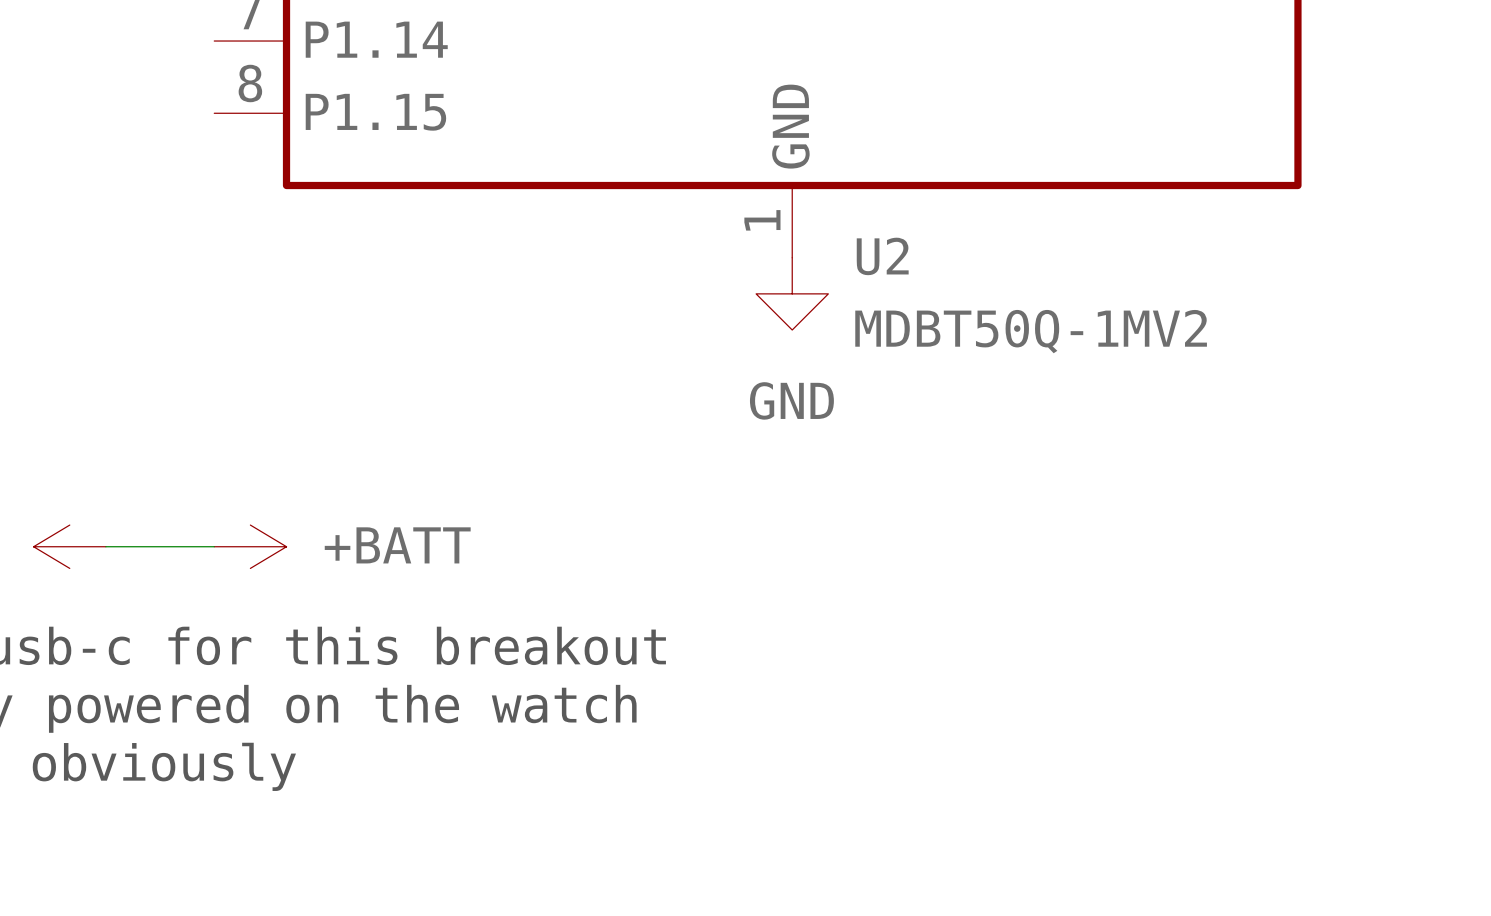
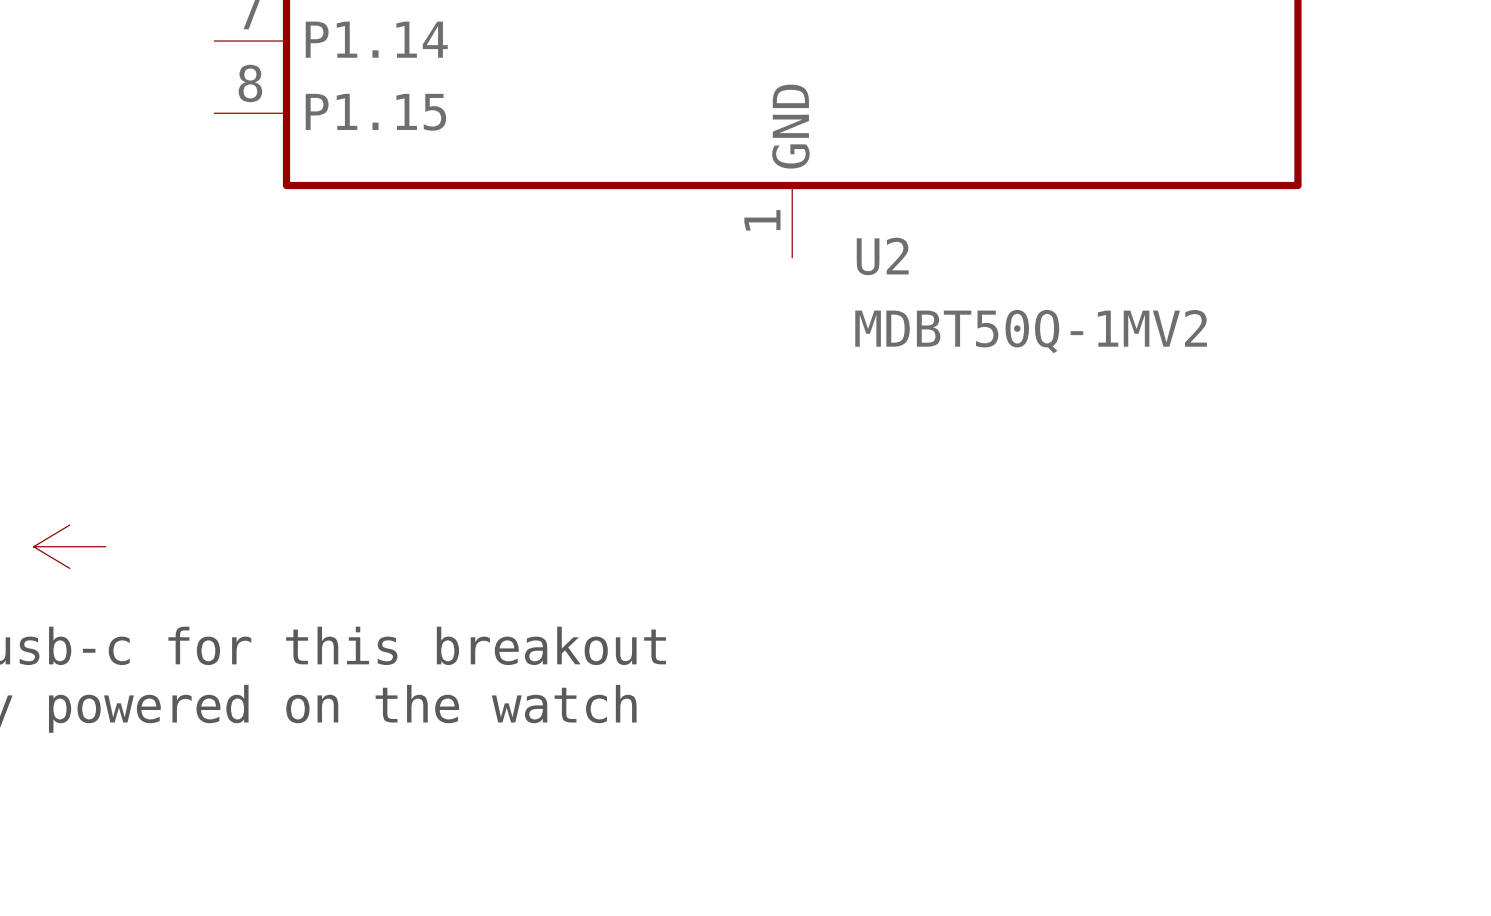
power symbol: GND (792, 293) -> none
wire: (105, 546) (214, 546) -> none
power symbol: +BATT (250, 546) -> none
text: obviously (164, 766) -> none

